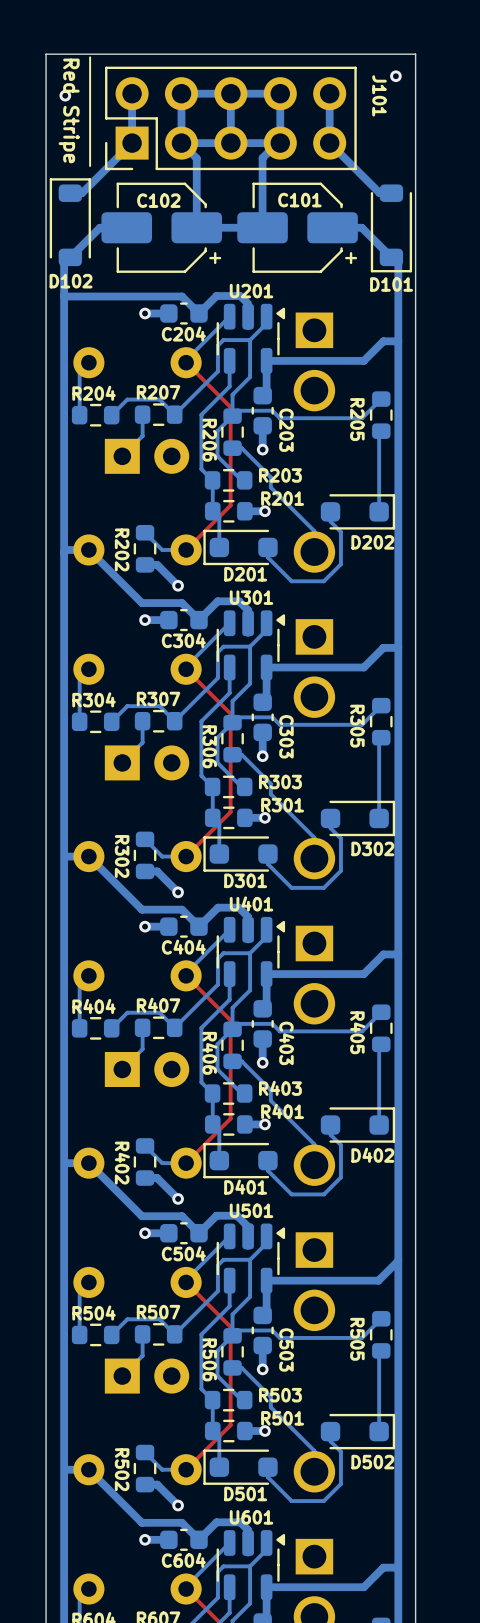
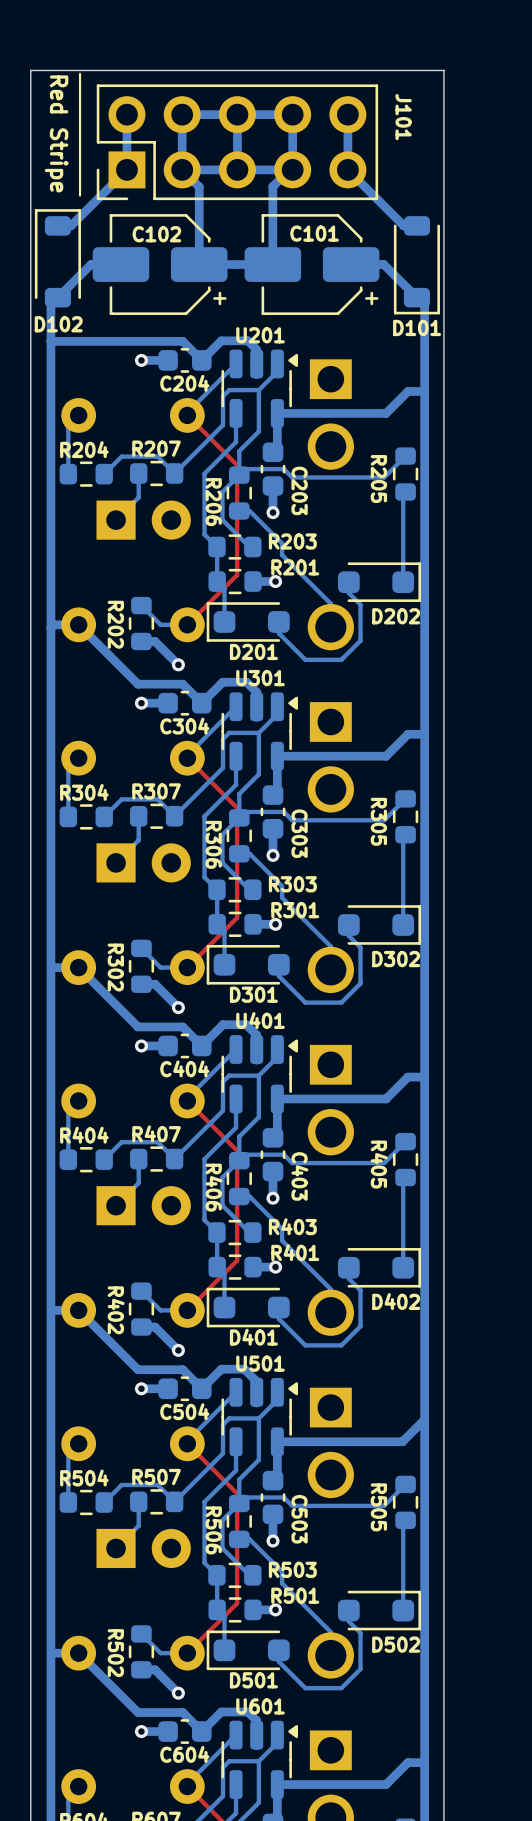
via: (395, 76) -> none
via: (65, 95) -> none

